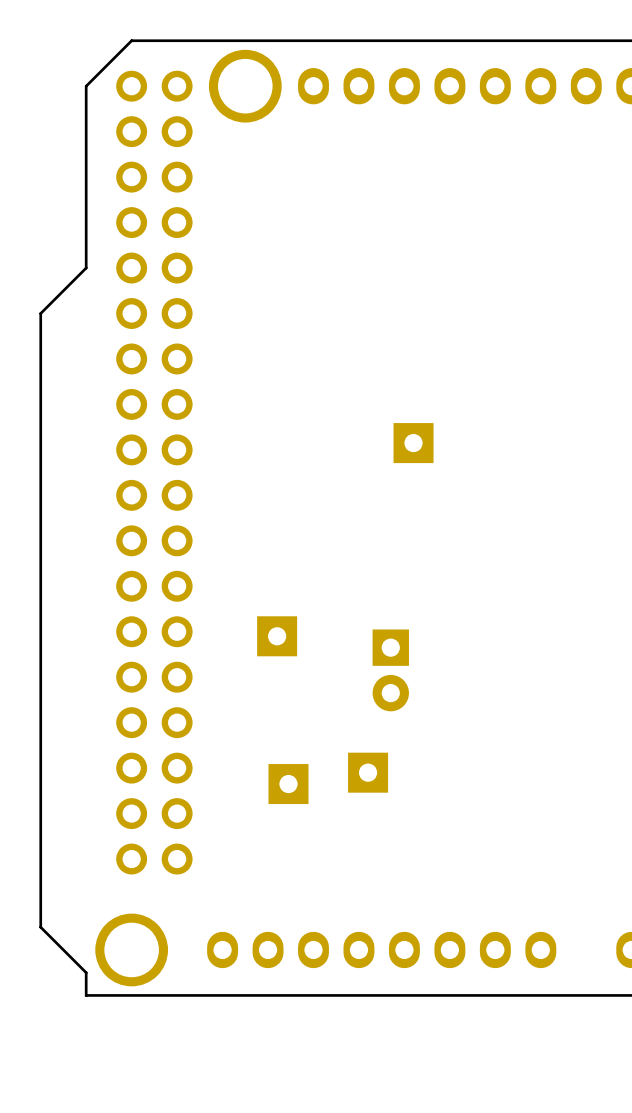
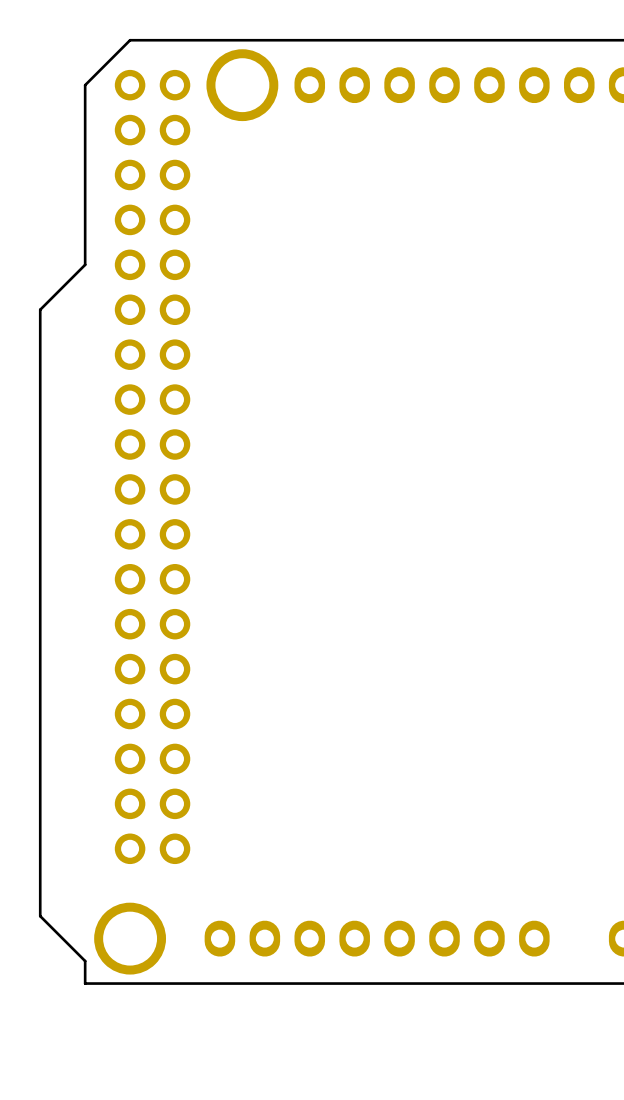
part: (413, 443) -> none
part: (277, 636) -> none
part: (390, 670) -> none
part: (368, 772) -> none
part: (288, 784) -> none

